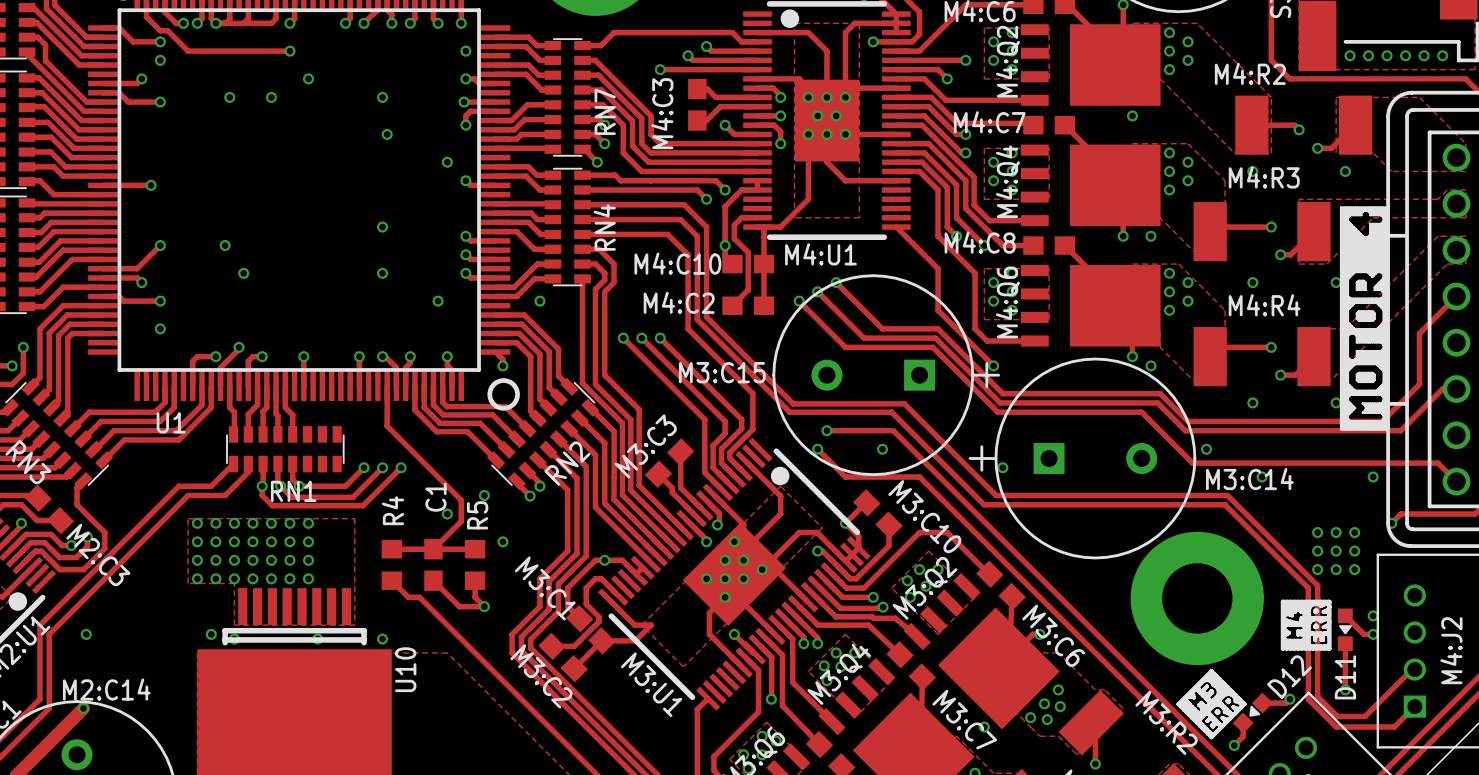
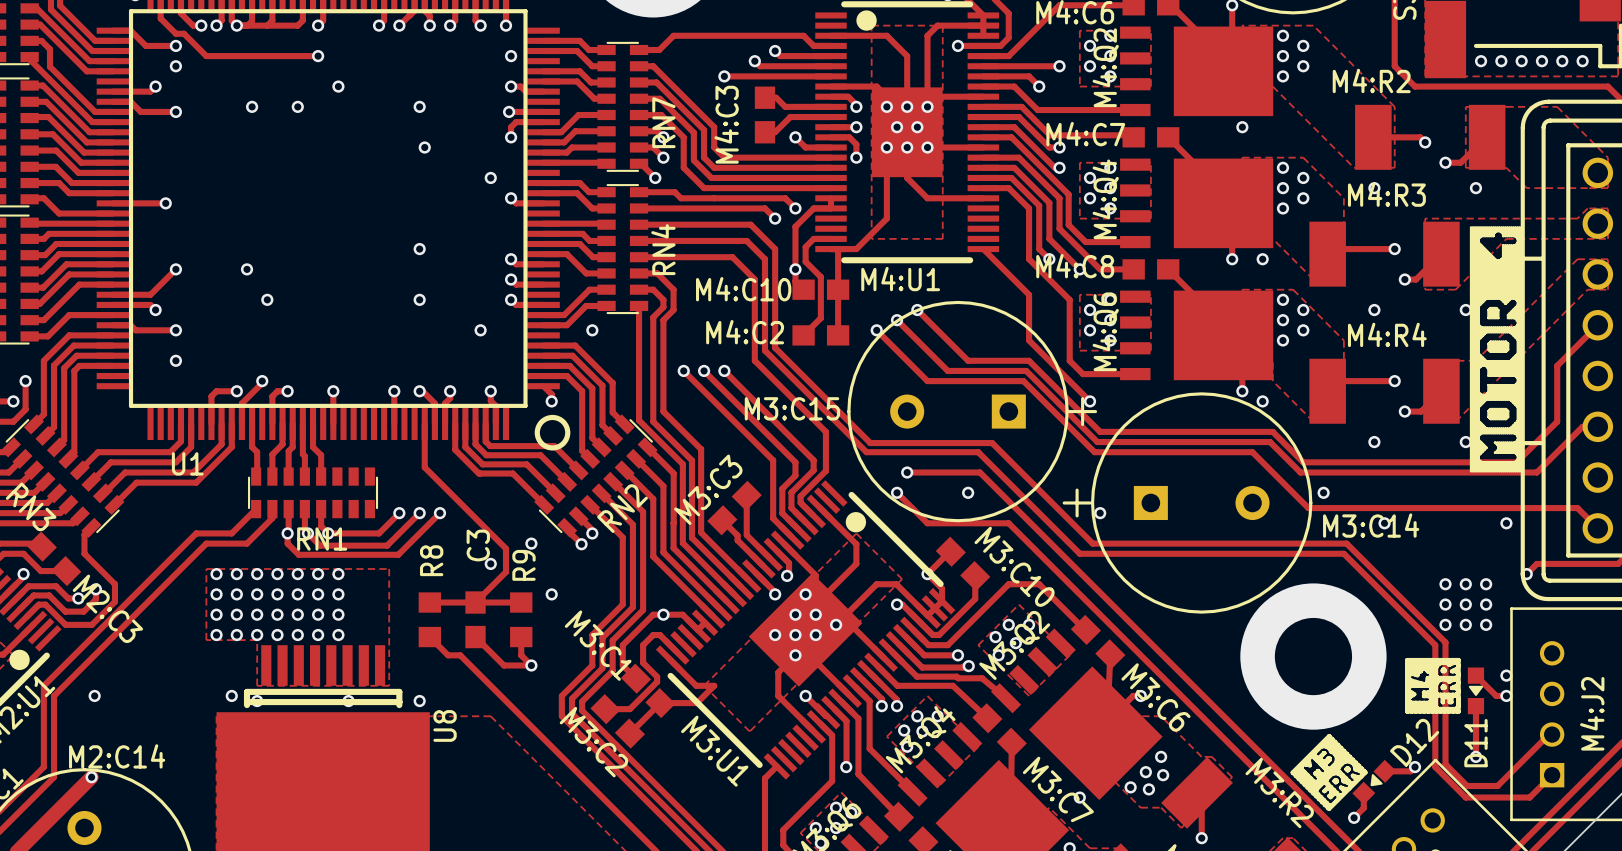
C1 name: C1 (435, 497) -> C3 (478, 545)
R4 name: R4 (393, 510) -> R8 (431, 560)
R5 name: R5 (477, 515) -> R9 (523, 565)
U10 name: U10 (405, 669) -> U8 (445, 725)

